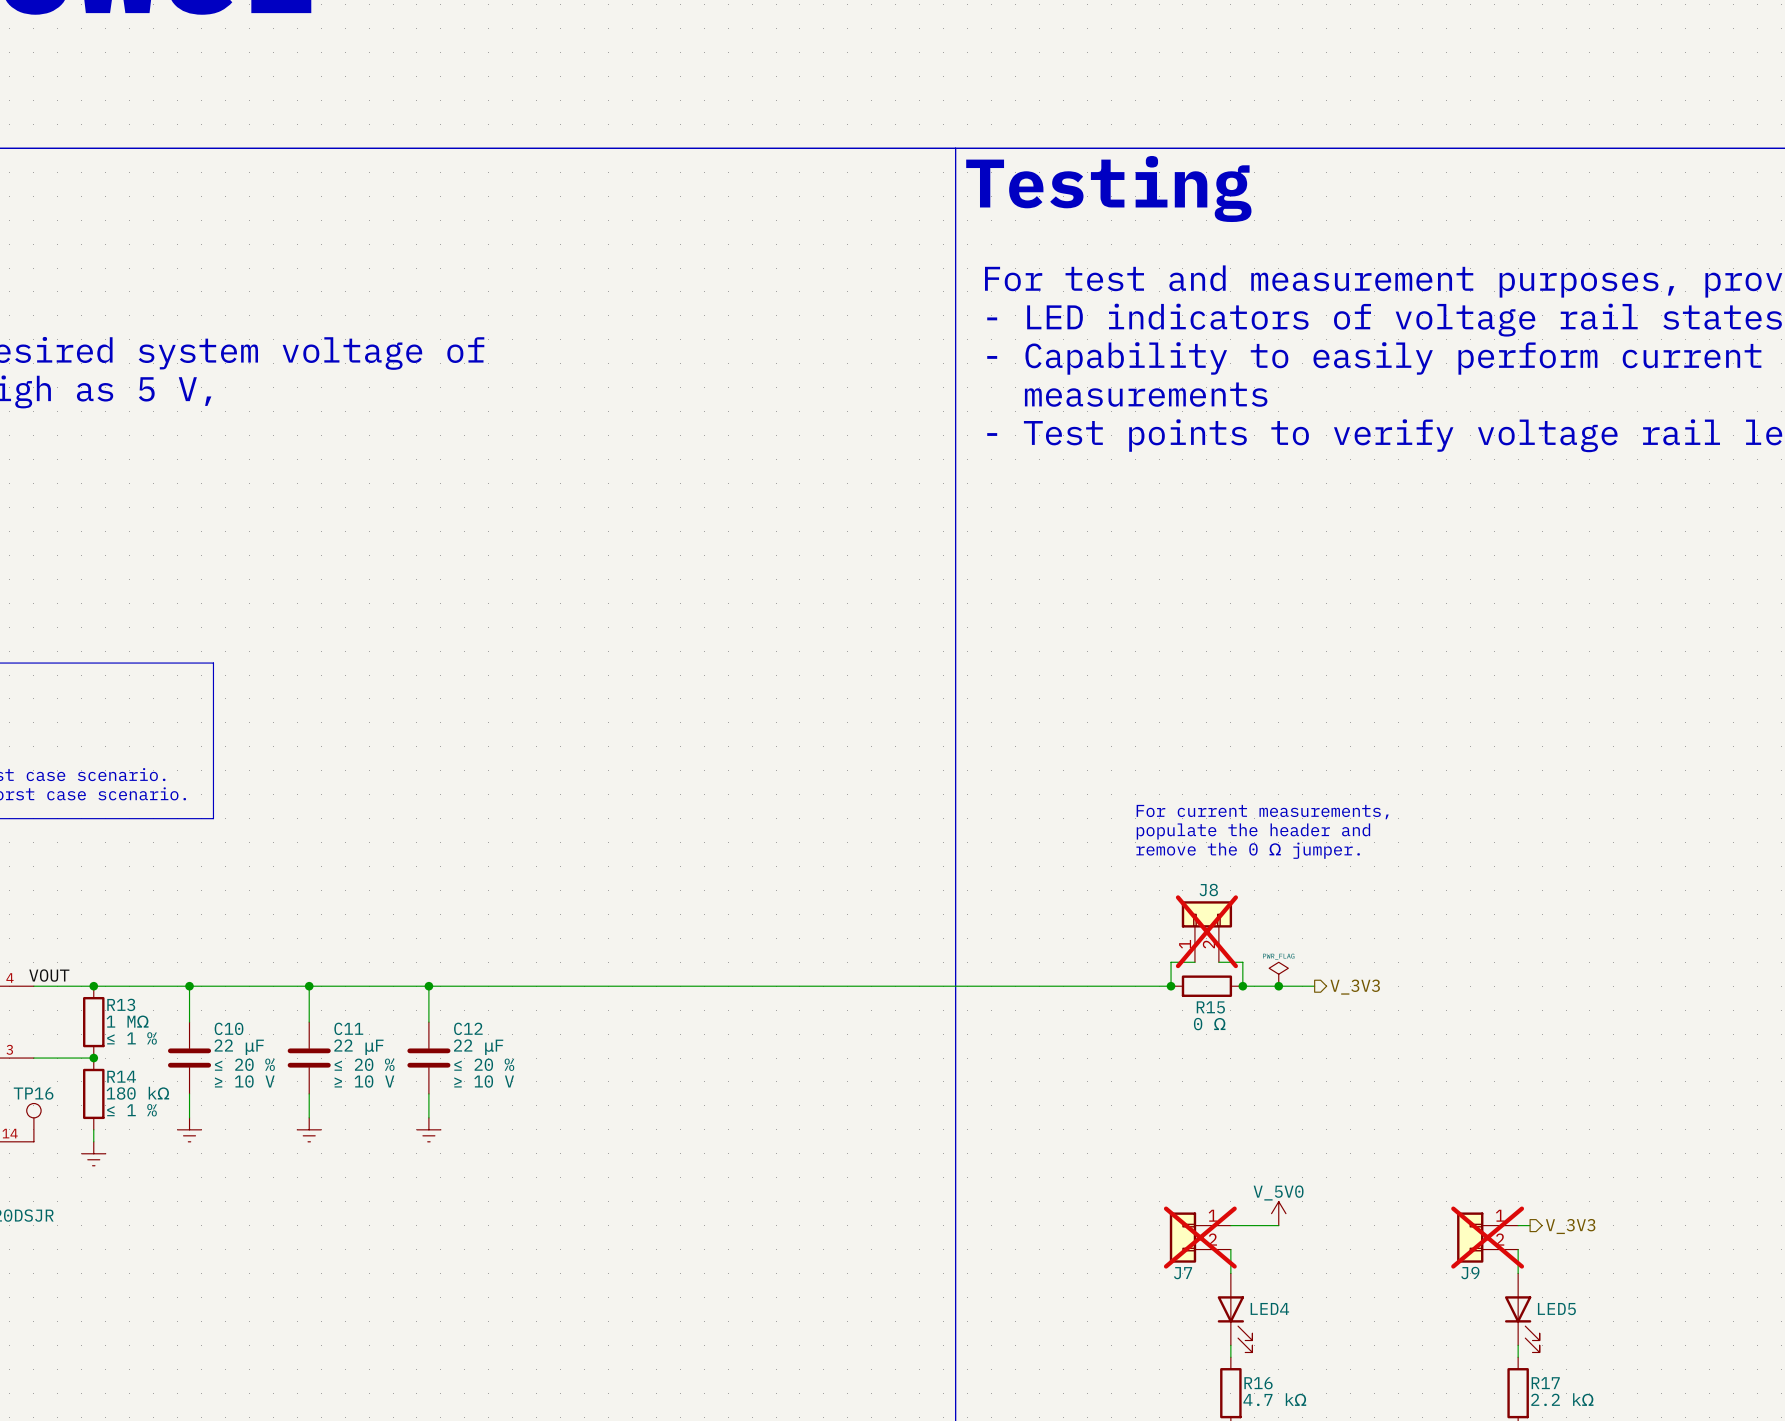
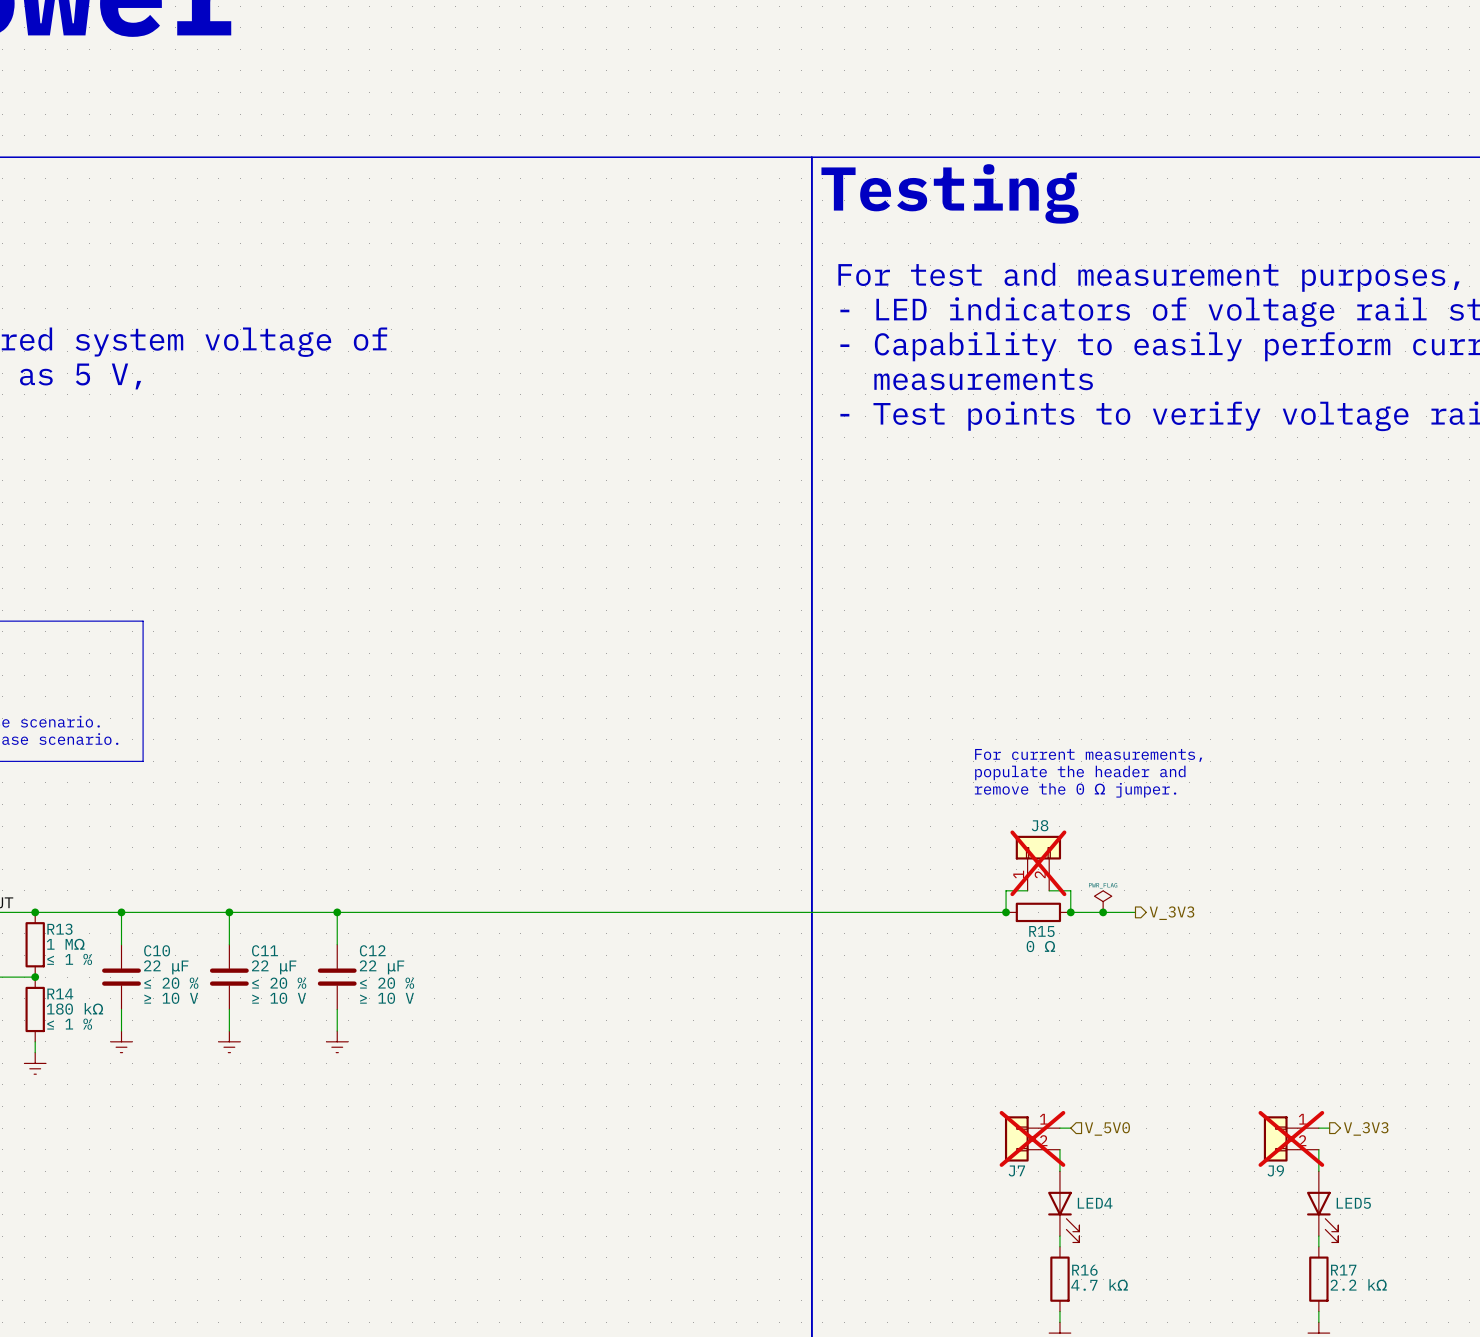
power symbol: V_5V0 (1278, 1213) -> none
wire: (1242, 1225) (1278, 1225) -> none
hierarchical label: none -> V_5V0 (1107, 1128)

